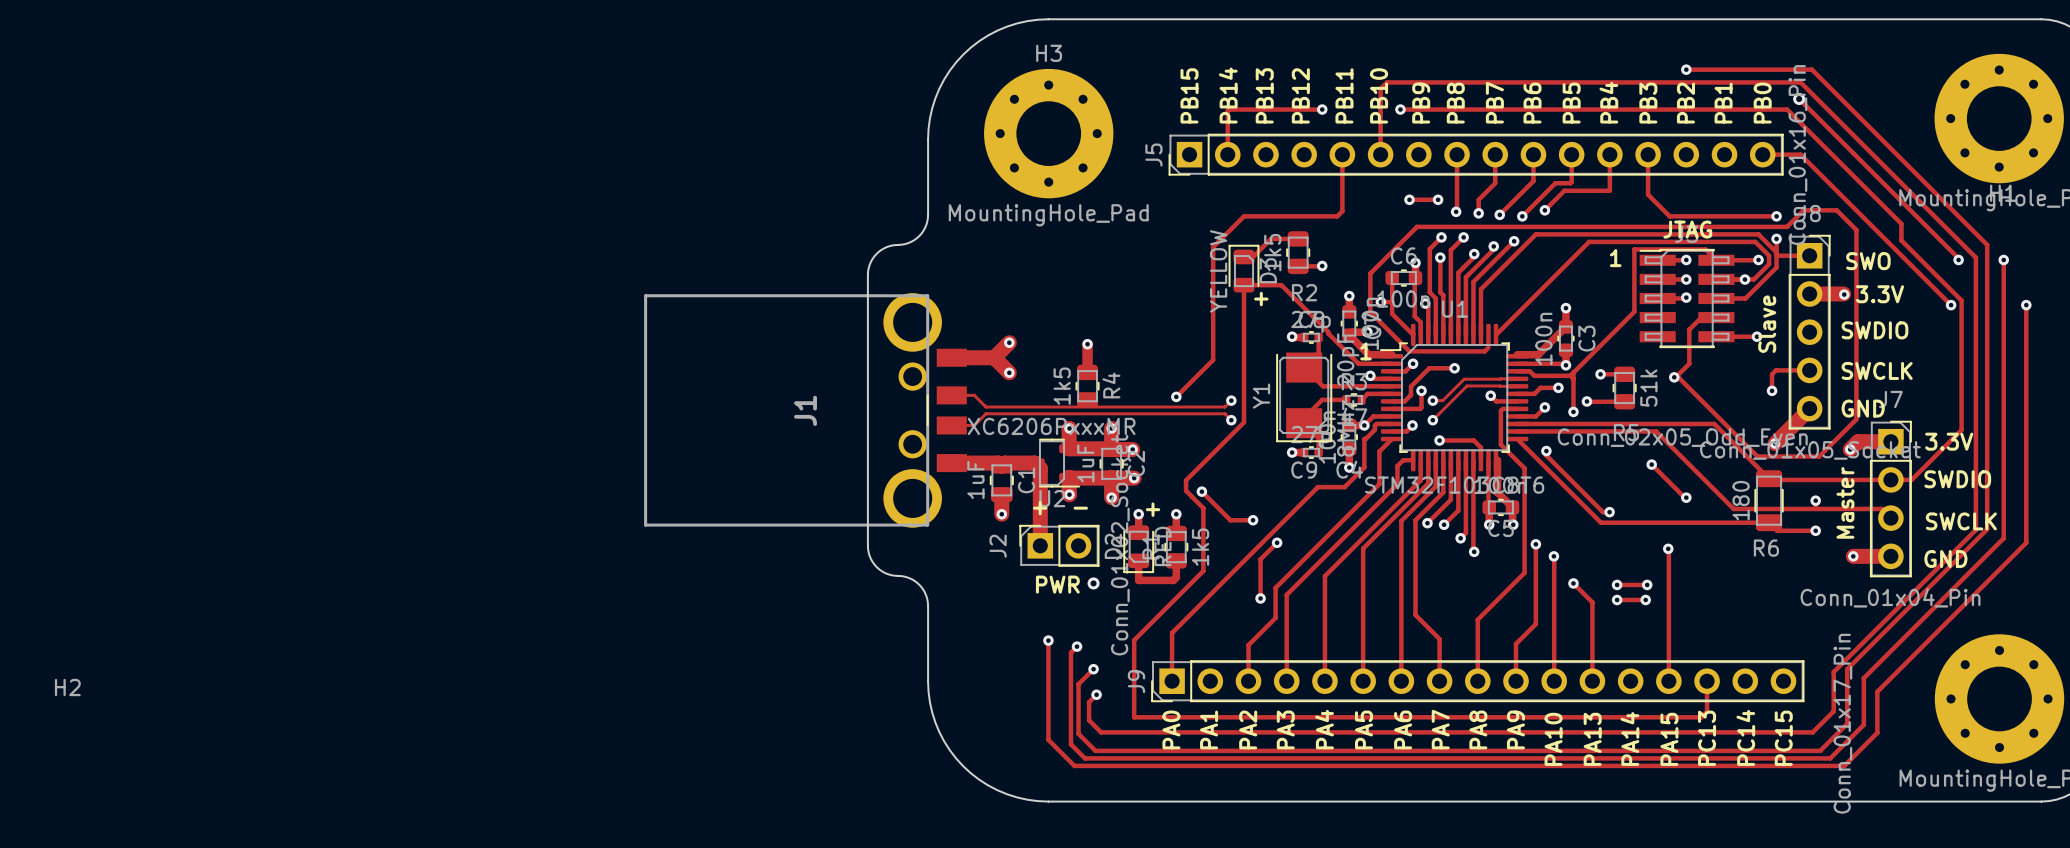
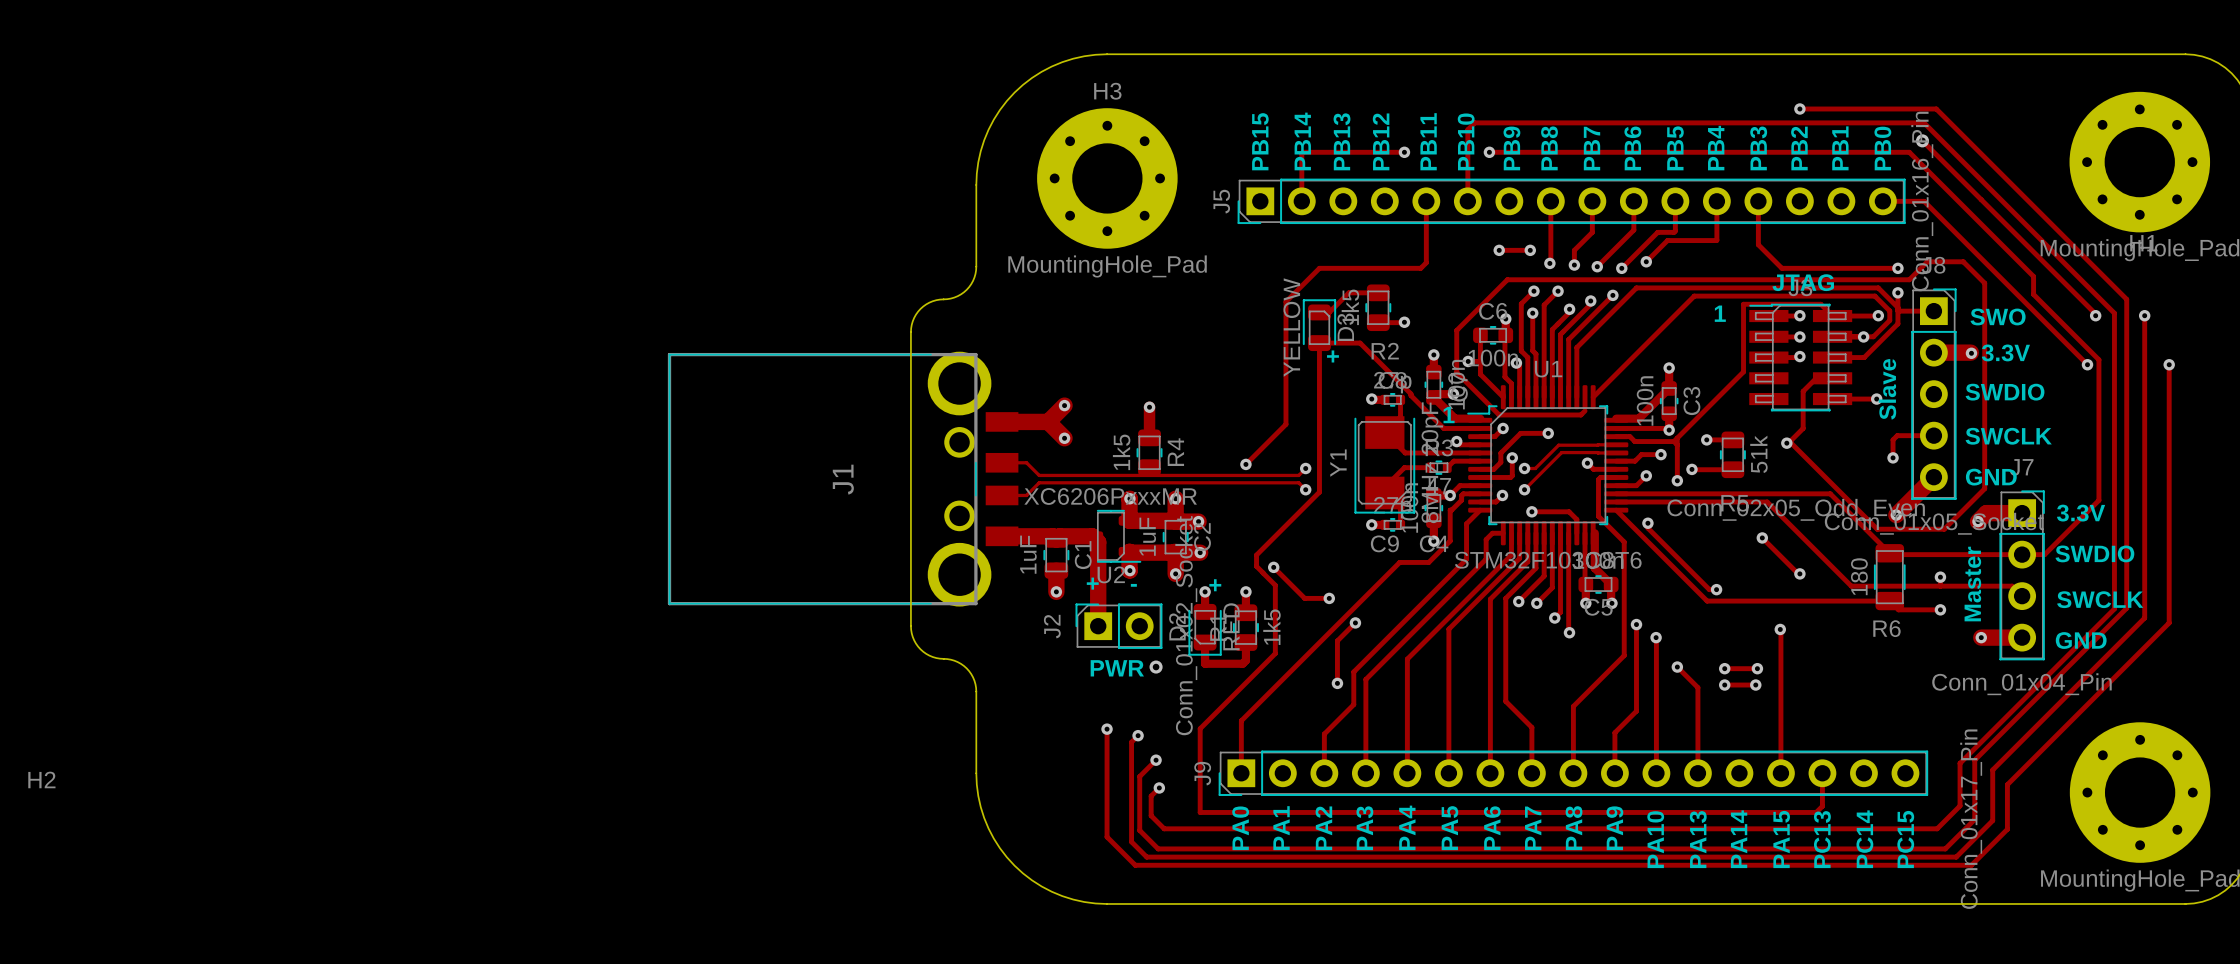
J1 footprint: [644, 293, 967, 528] -> [667, 351, 1019, 607]

